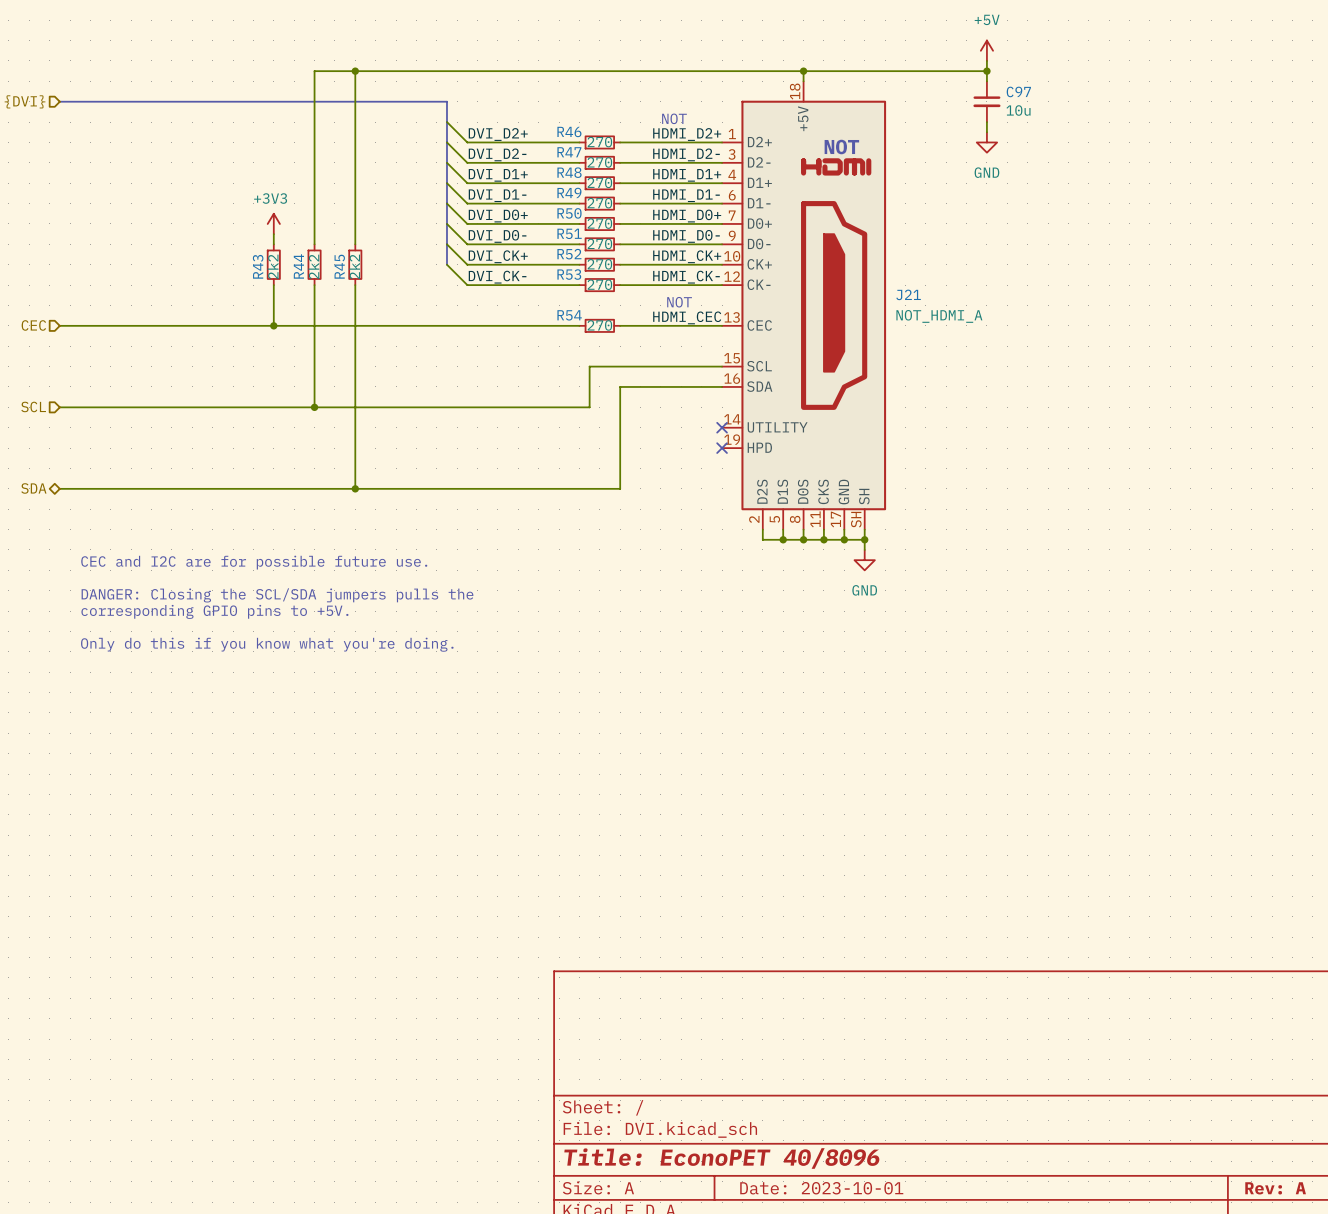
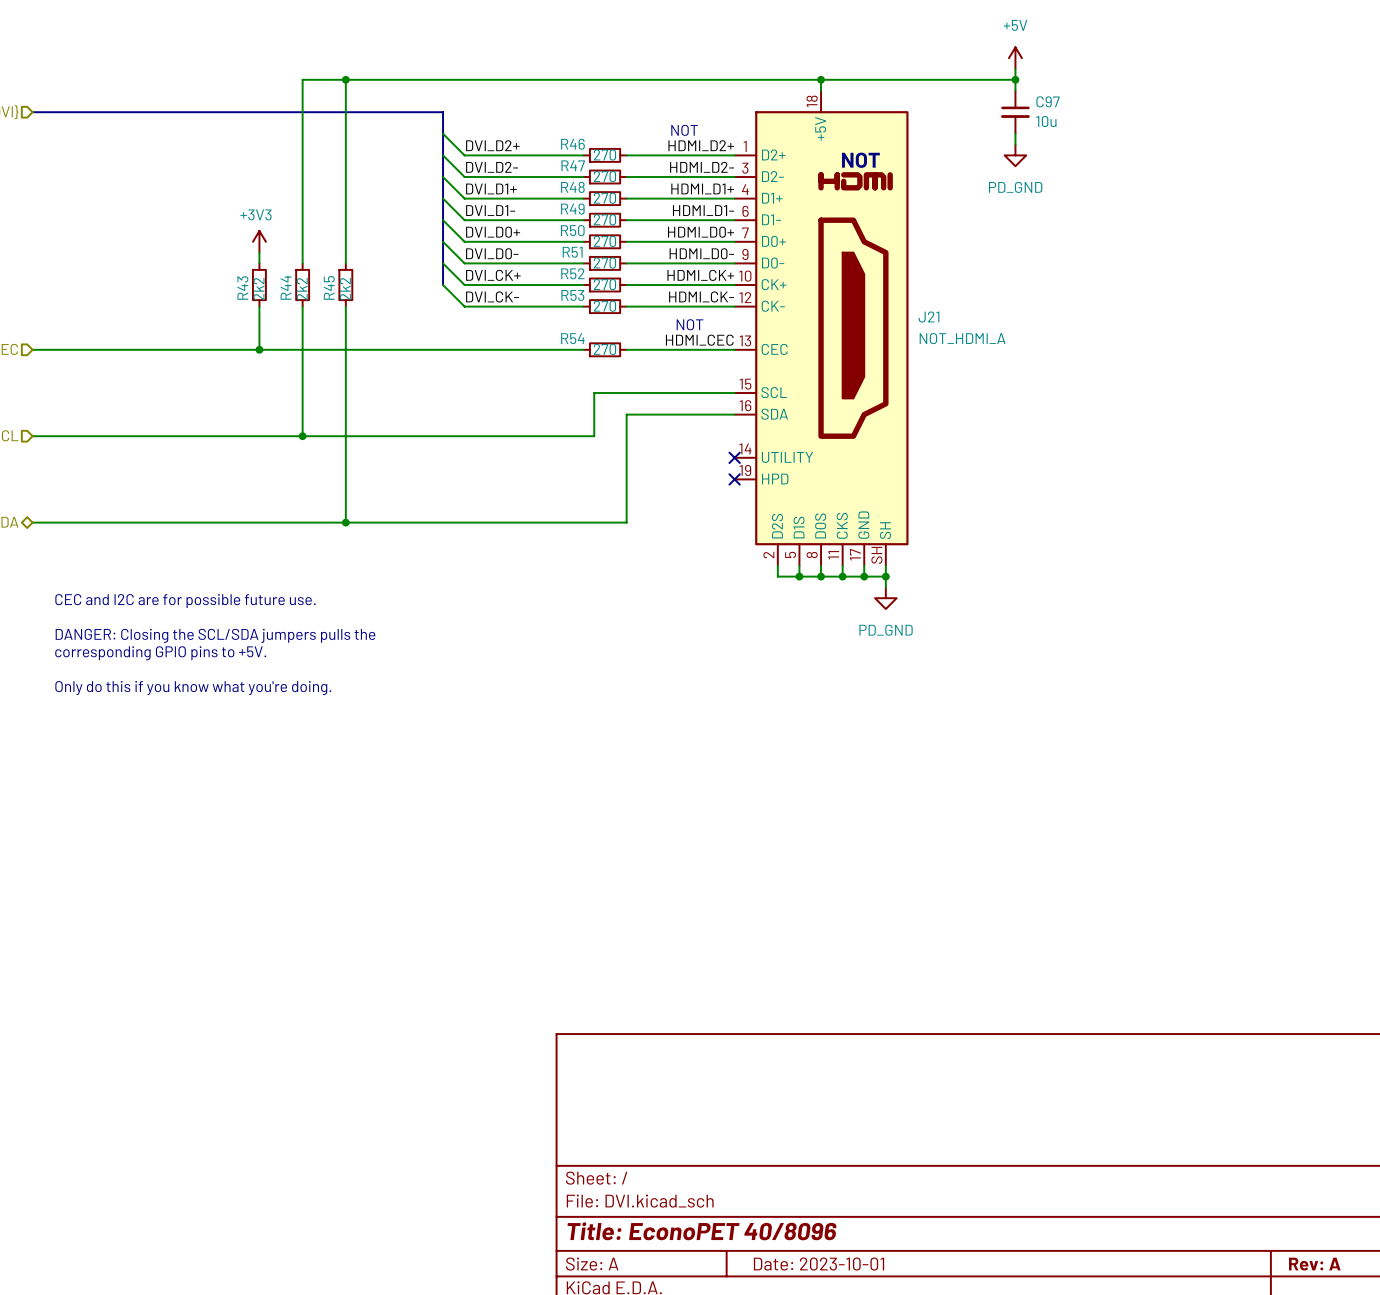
power symbol: GND (986, 142) -> PD_GND (1015, 155)
power symbol: GND (864, 560) -> PD_GND (885, 598)

